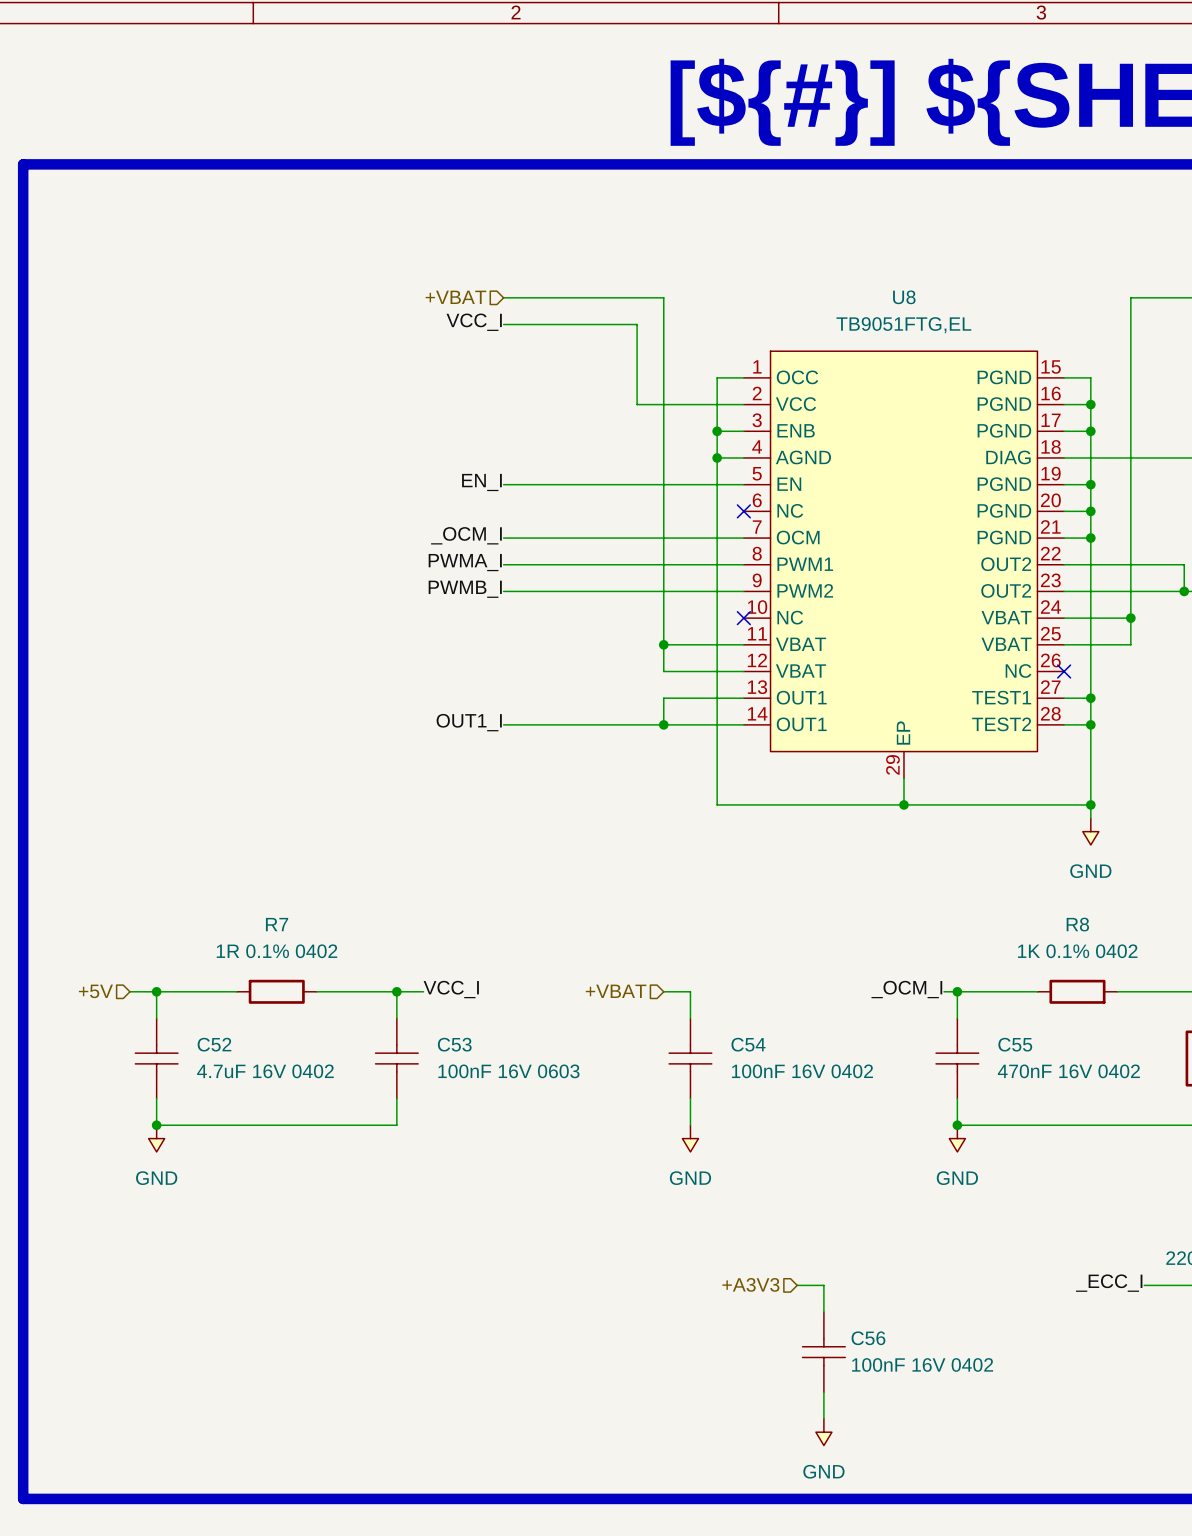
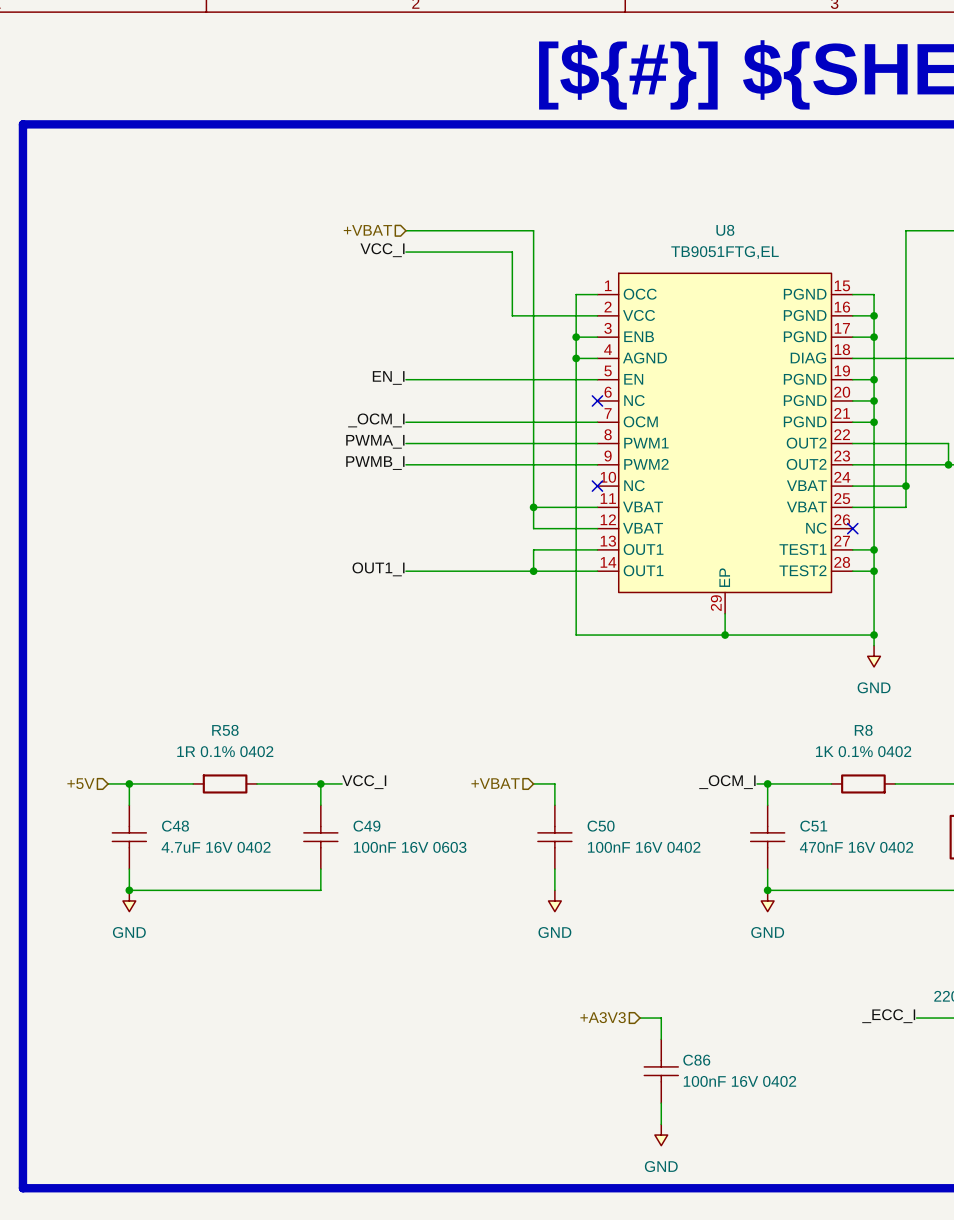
R7 name: R7 (277, 924) -> R58 (225, 730)
C52 name: C52 (214, 1044) -> C48 (175, 826)
C53 name: C53 (454, 1044) -> C49 (366, 826)
C54 name: C54 (748, 1044) -> C50 (601, 826)
C55 name: C55 (1015, 1044) -> C51 (813, 826)
C56 name: C56 (868, 1338) -> C86 (696, 1060)

